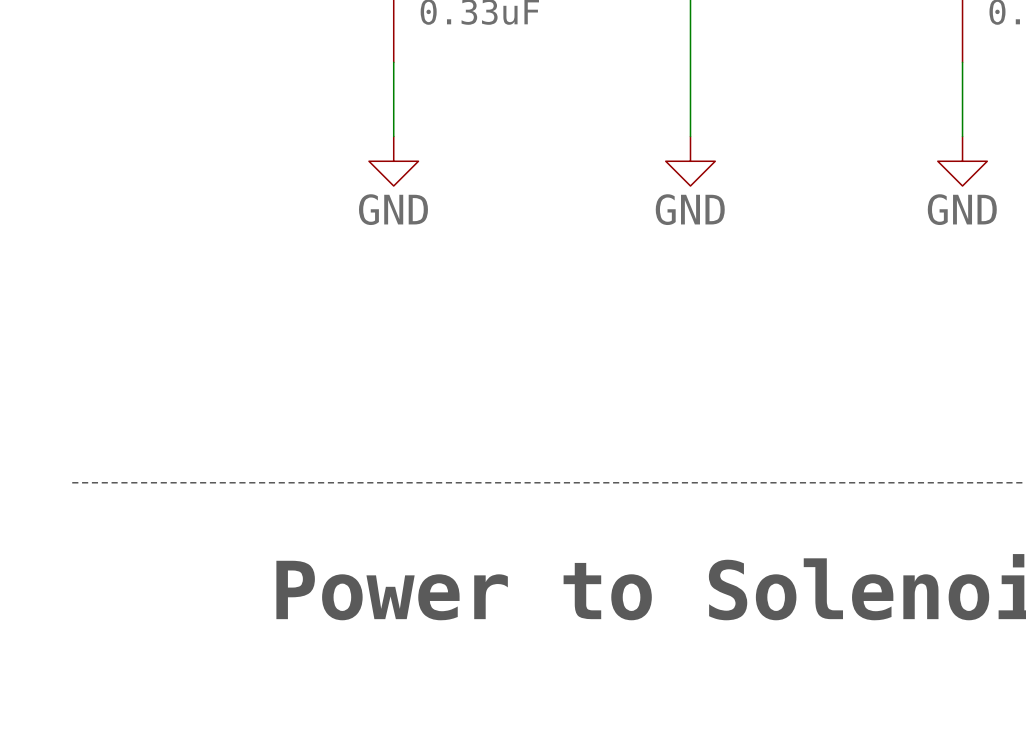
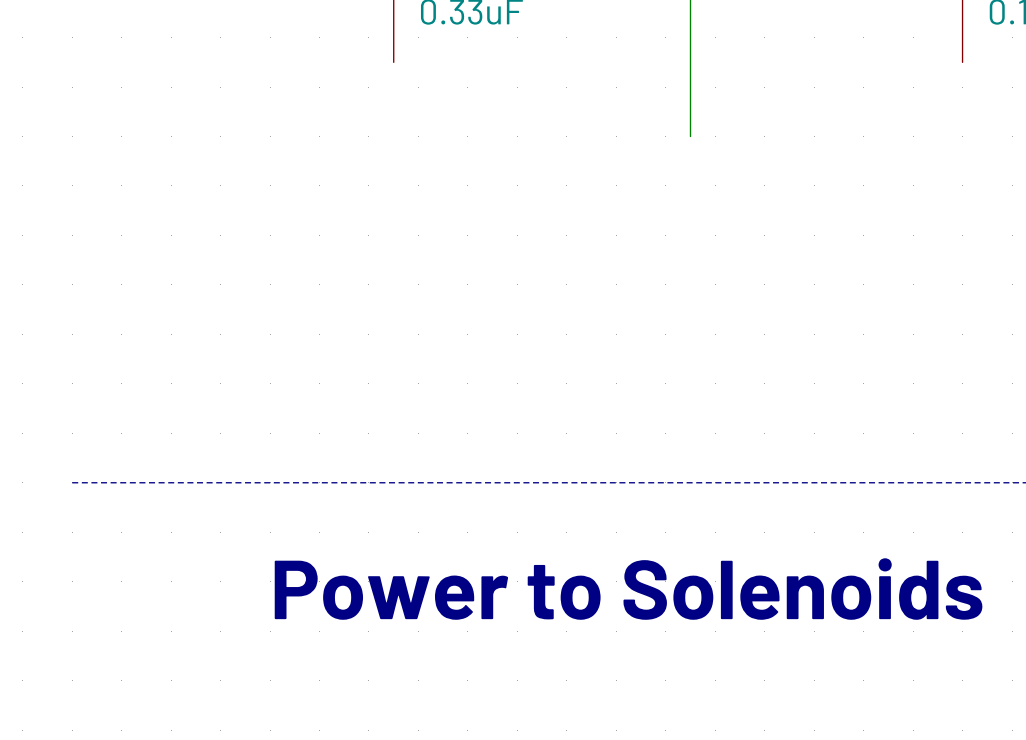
wire: (393, 62) (393, 136) -> none
wire: (962, 62) (962, 136) -> none
power symbol: GND (393, 161) -> none
power symbol: GND (690, 161) -> none
power symbol: GND (962, 161) -> none

